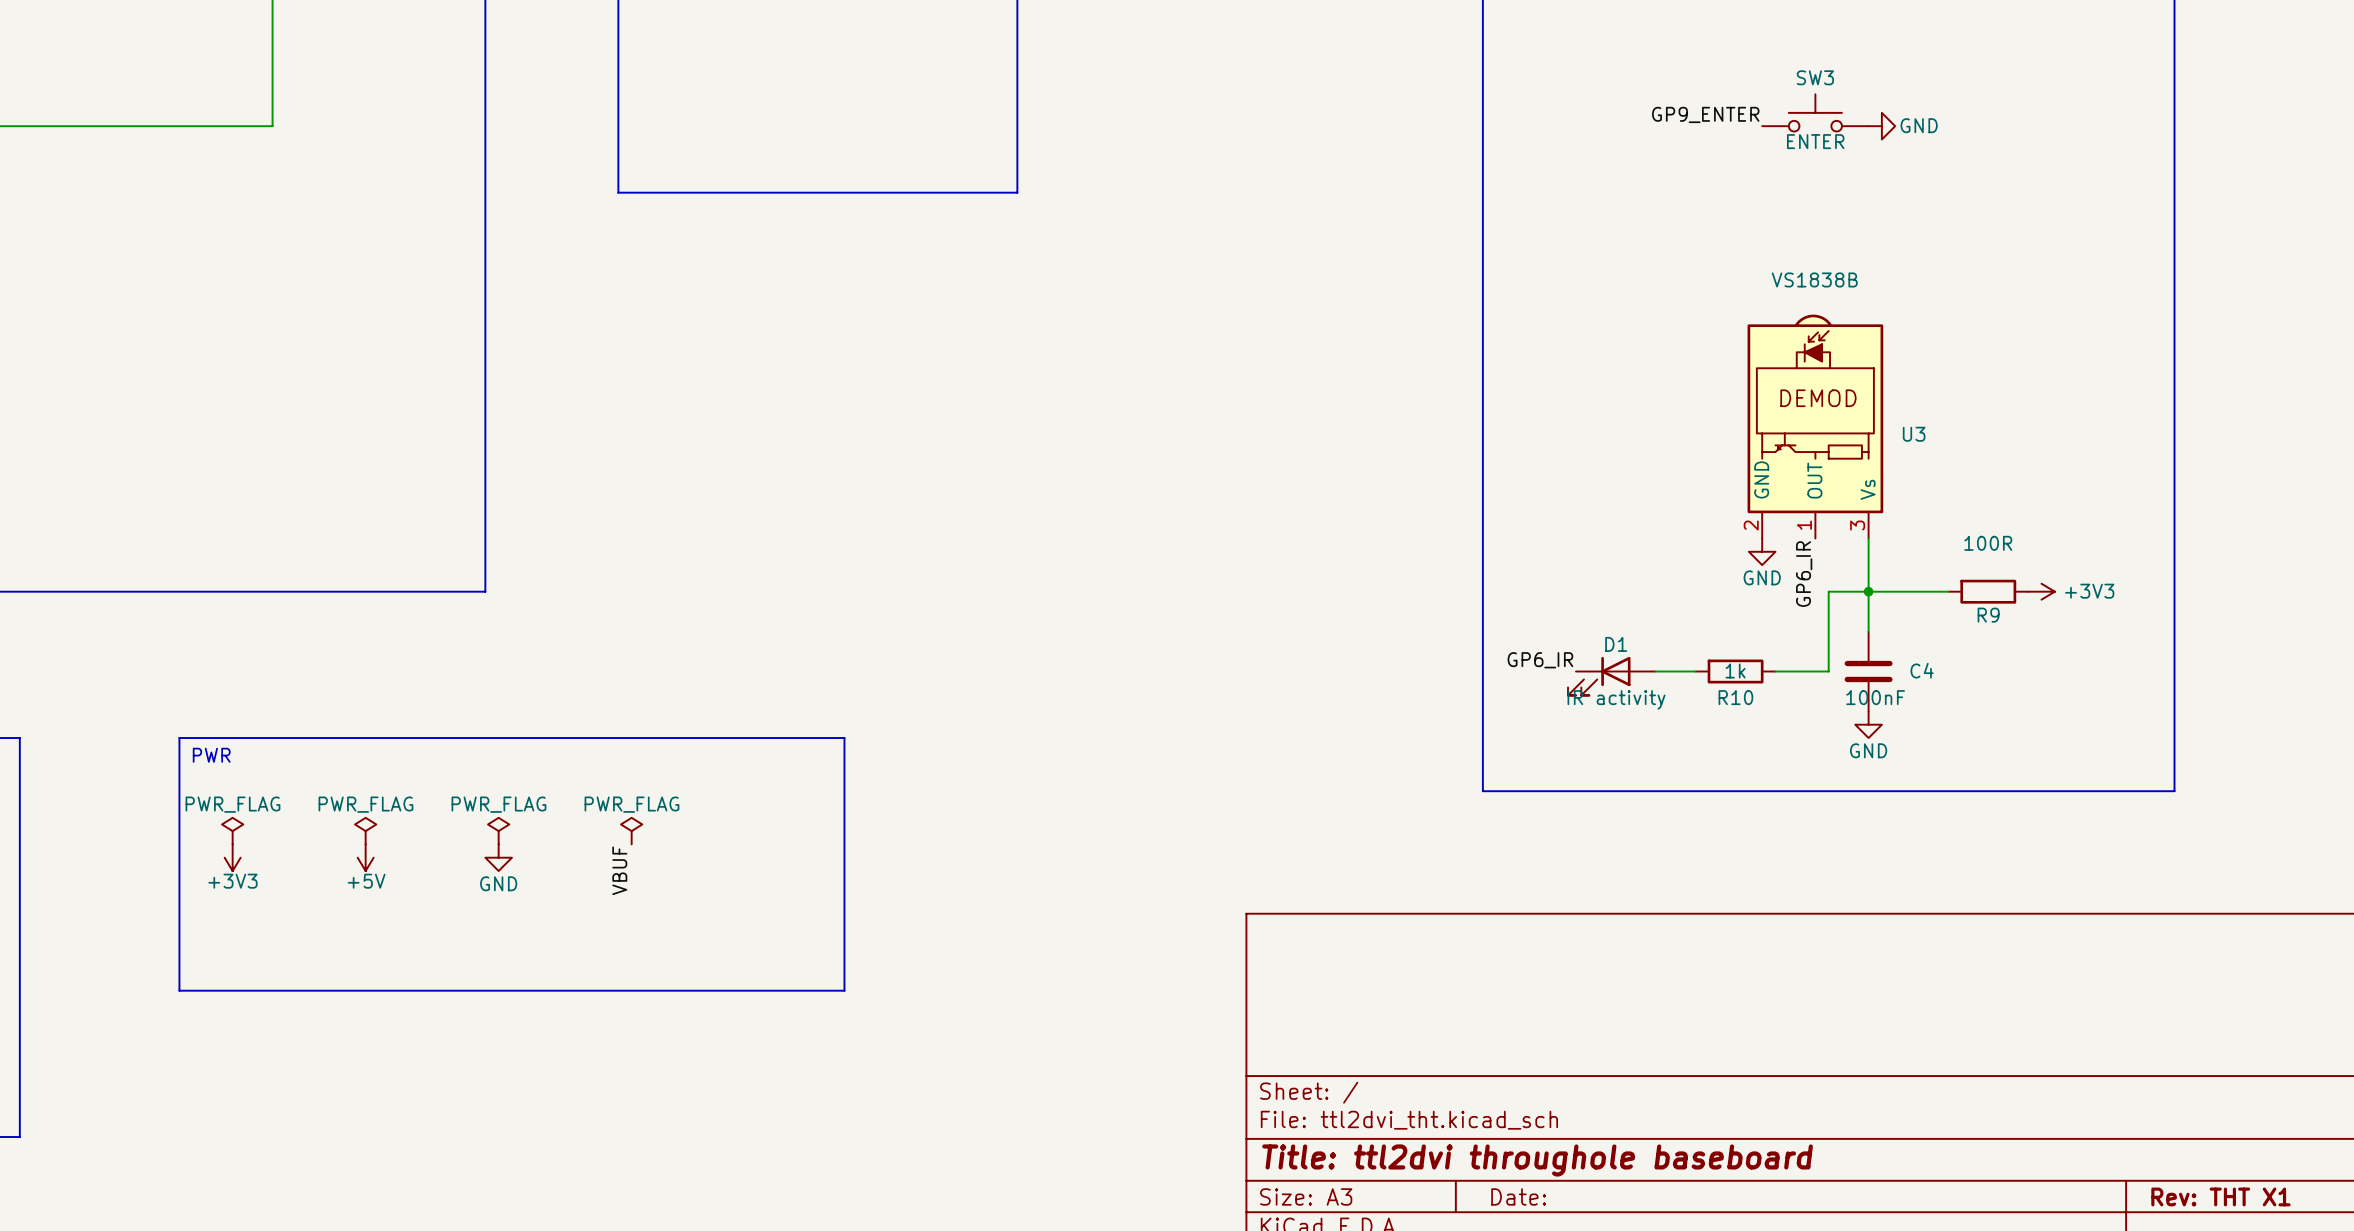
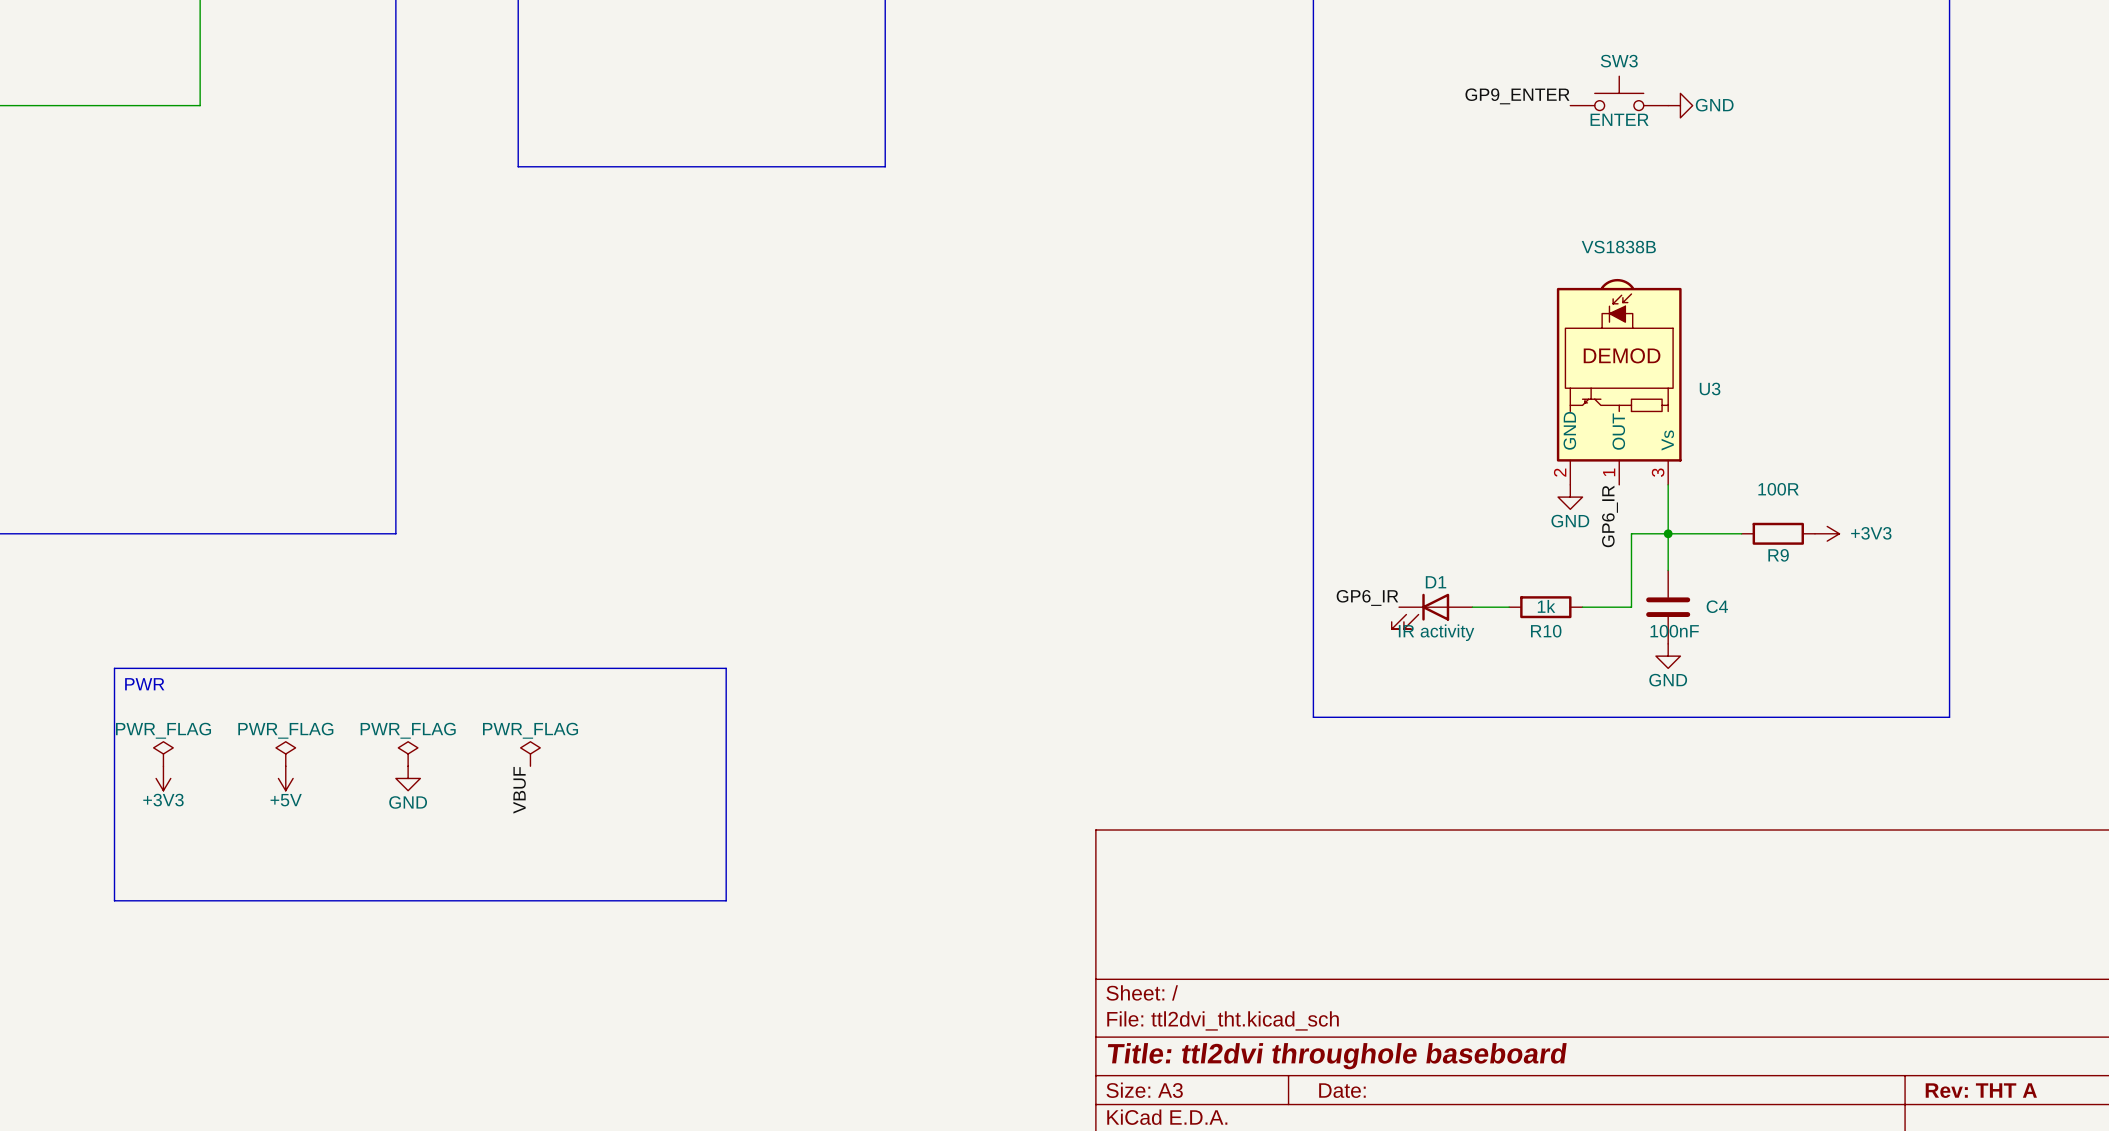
title block: Rev: THT X1 (2220, 1196) -> Rev: THT A (1981, 1090)

